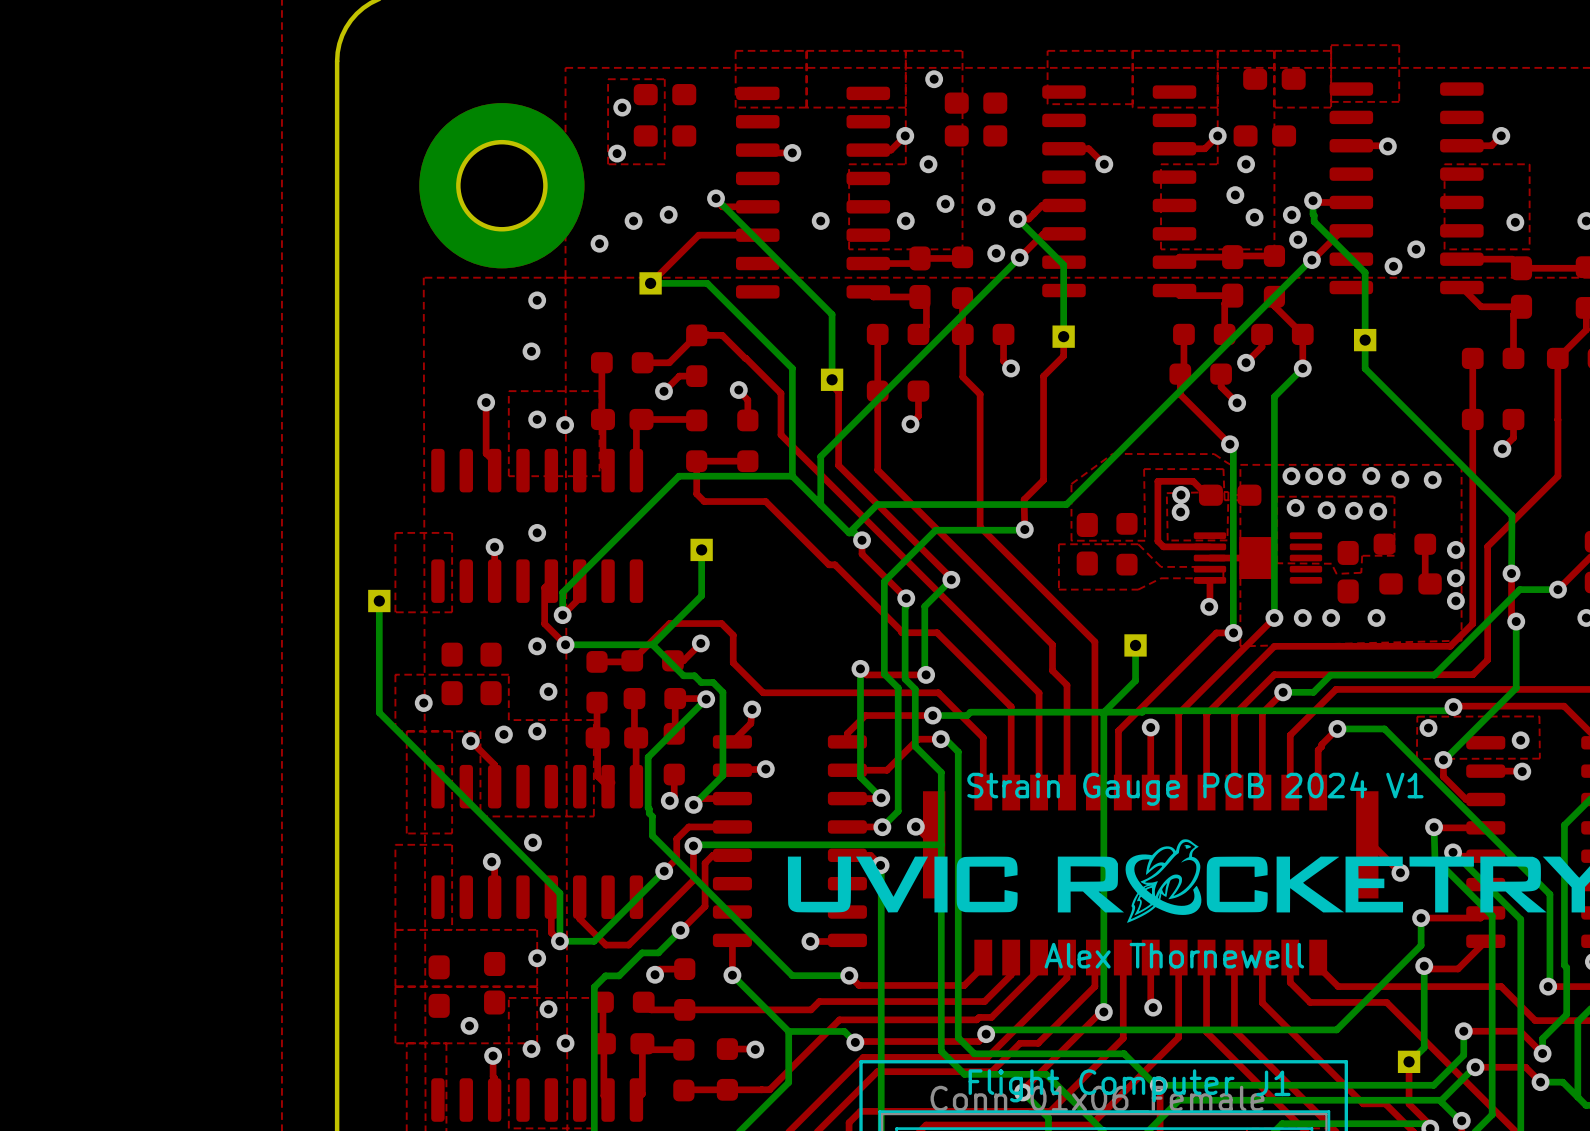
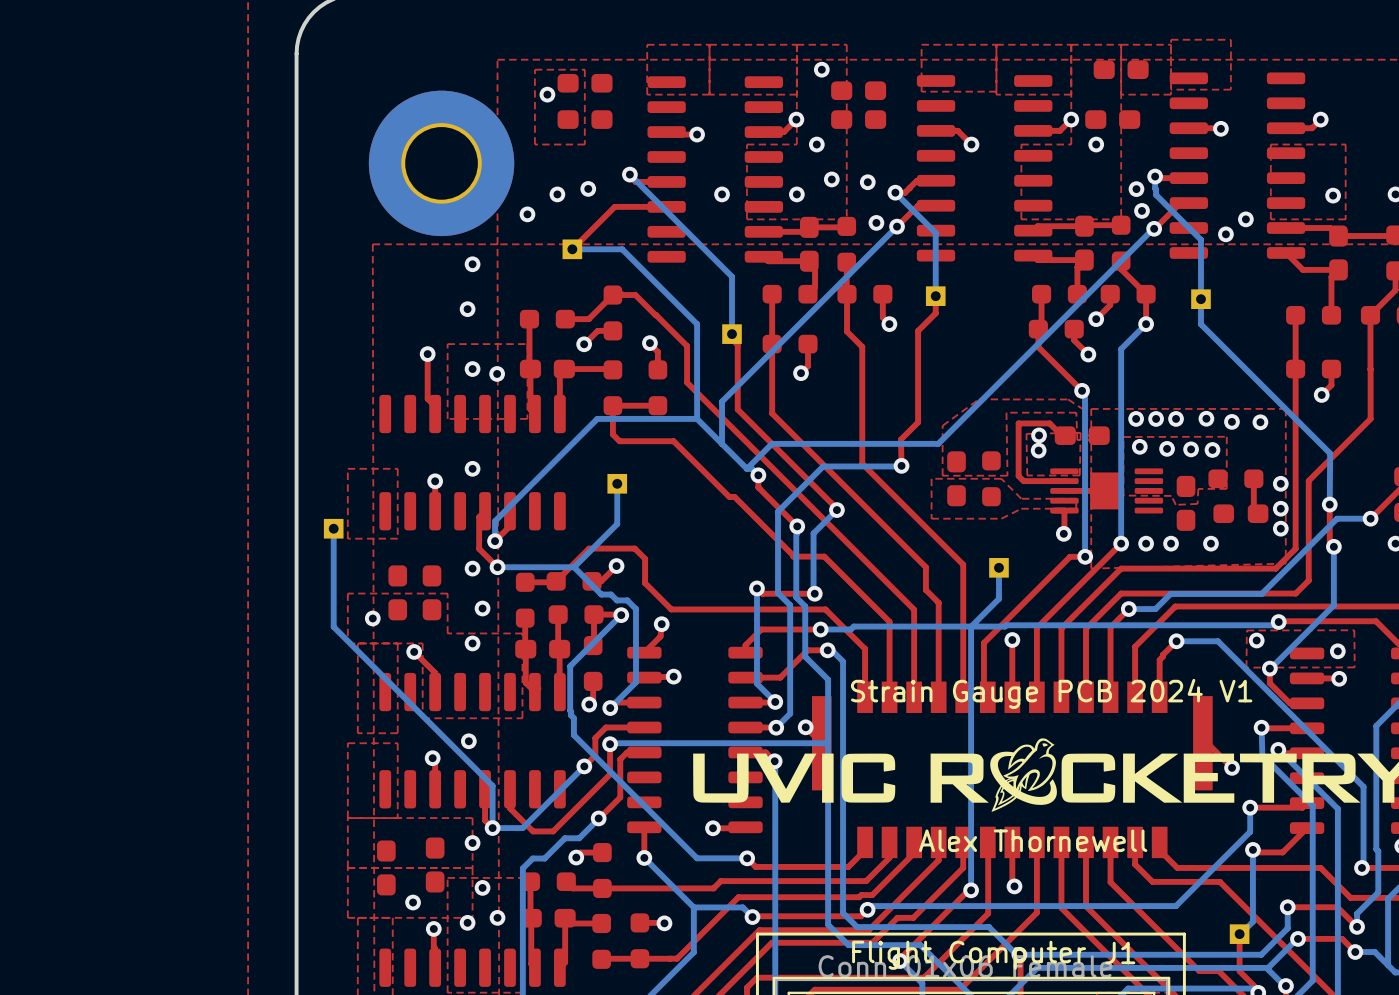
via: (617, 153) -> none
via: (1235, 195) -> none
via: (1254, 217) -> none
via: (503, 734) -> none

